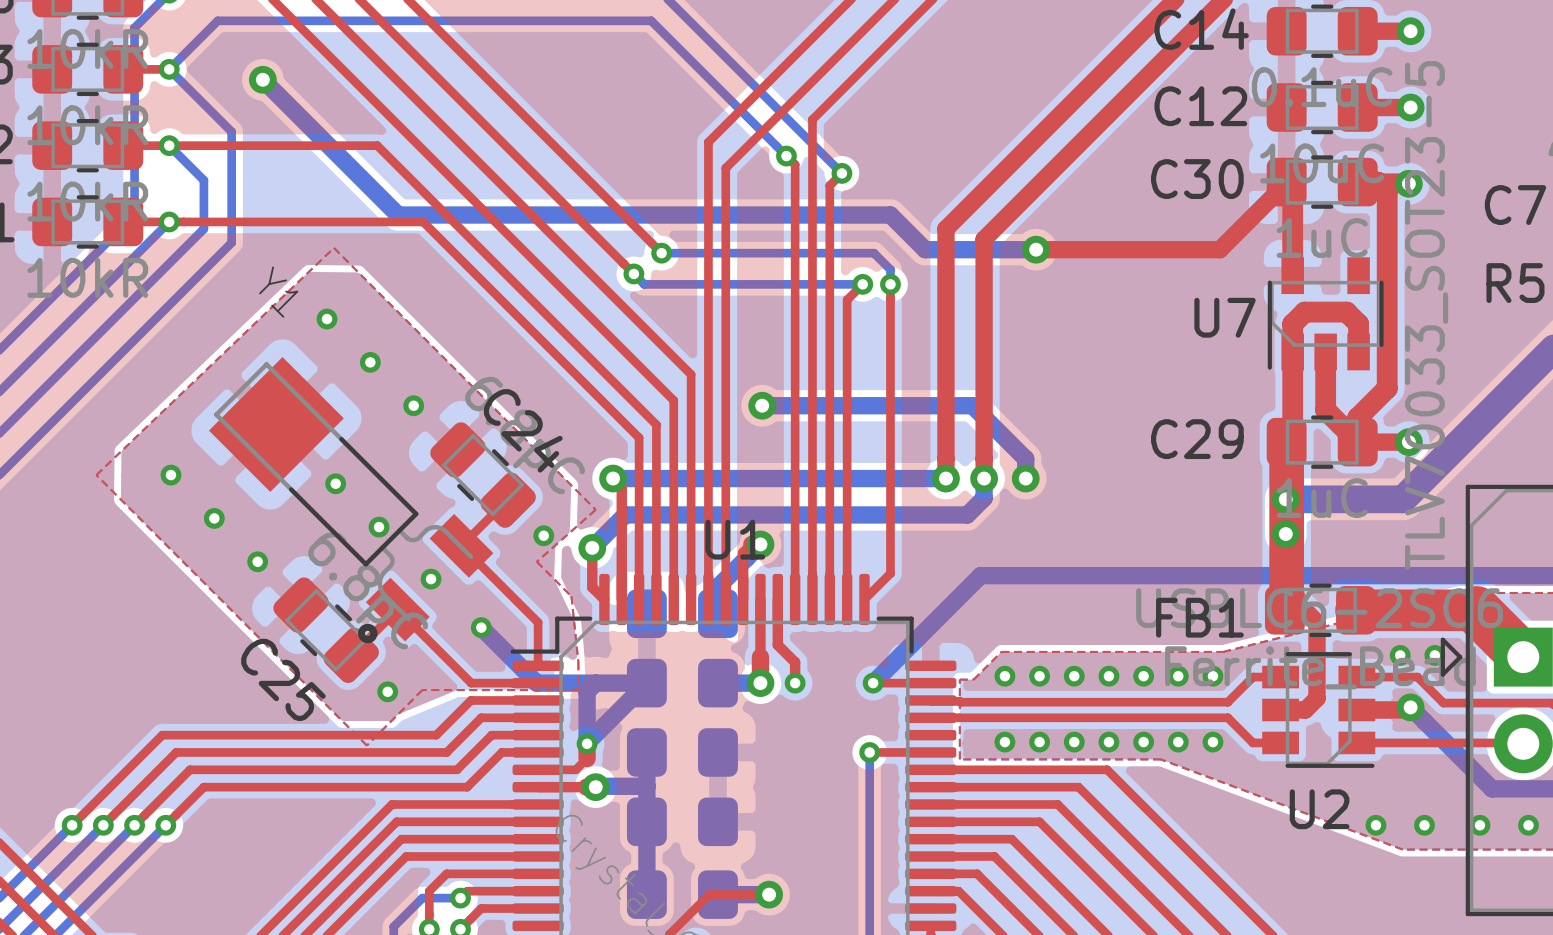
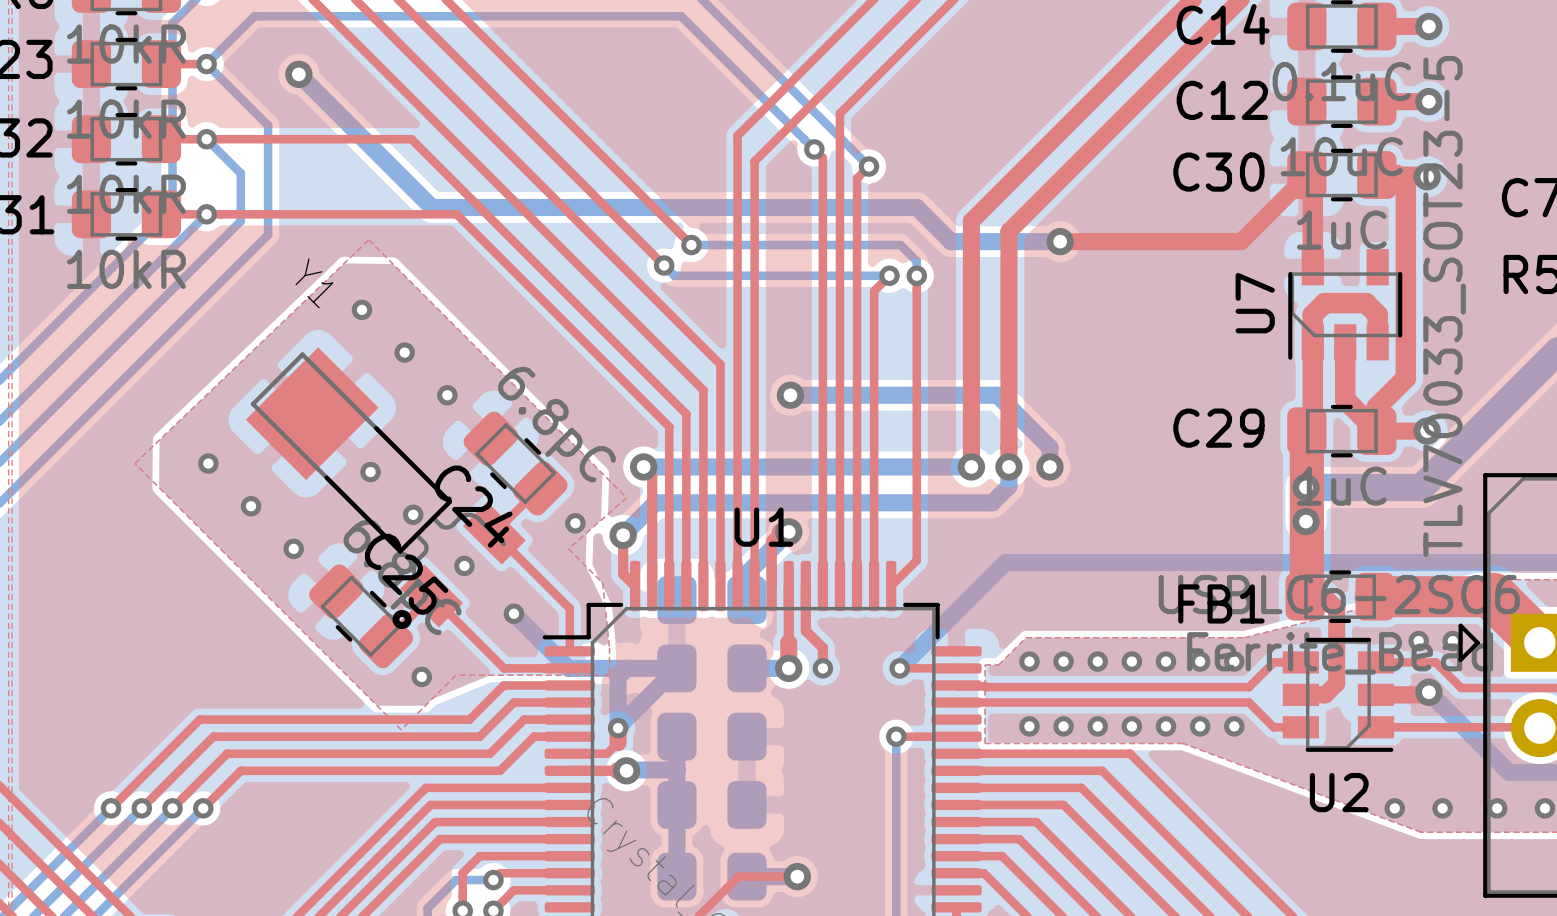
U7 name rotation: 0° (1225, 317) -> 90° counterclockwise (1255, 303)
C24 name position: C24 (523, 430) -> C24 (473, 506)
C25 name position: C25 (283, 679) -> C25 (406, 574)

